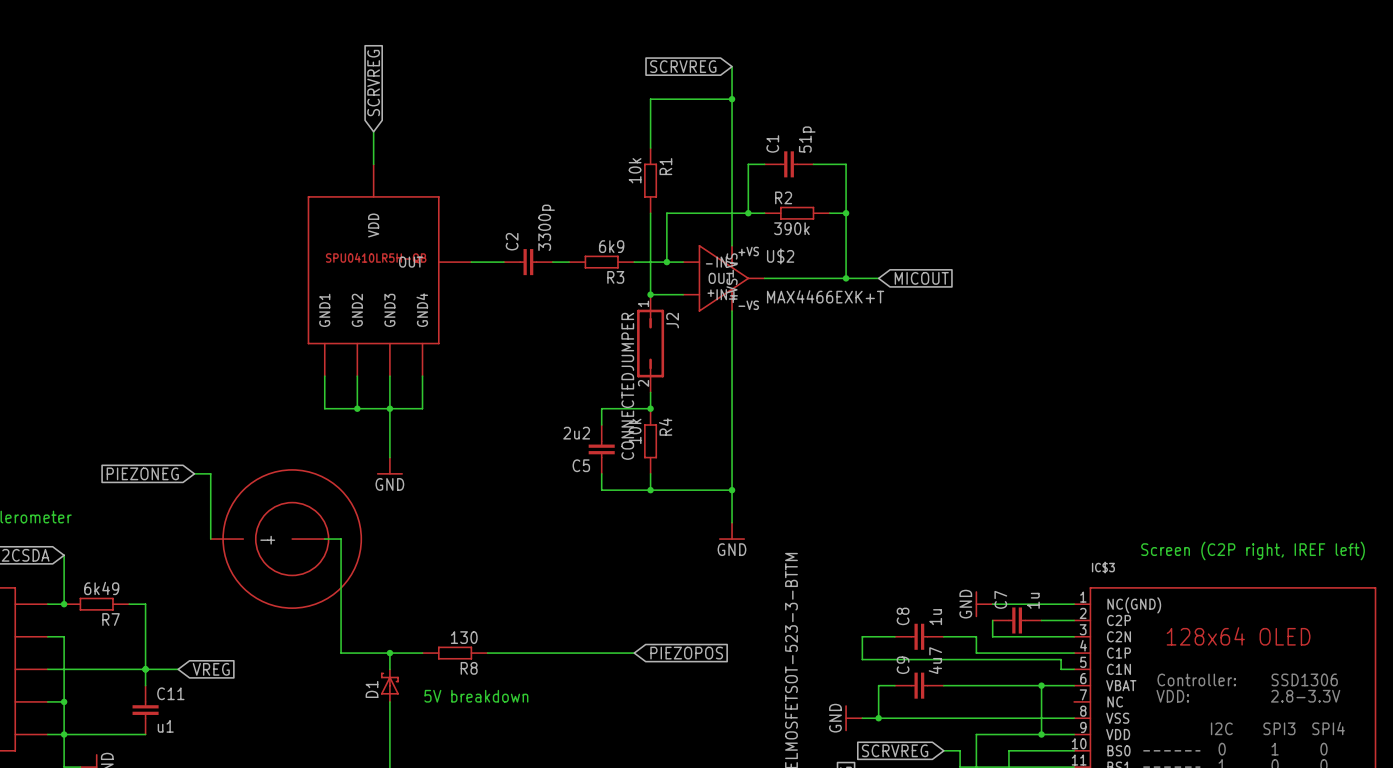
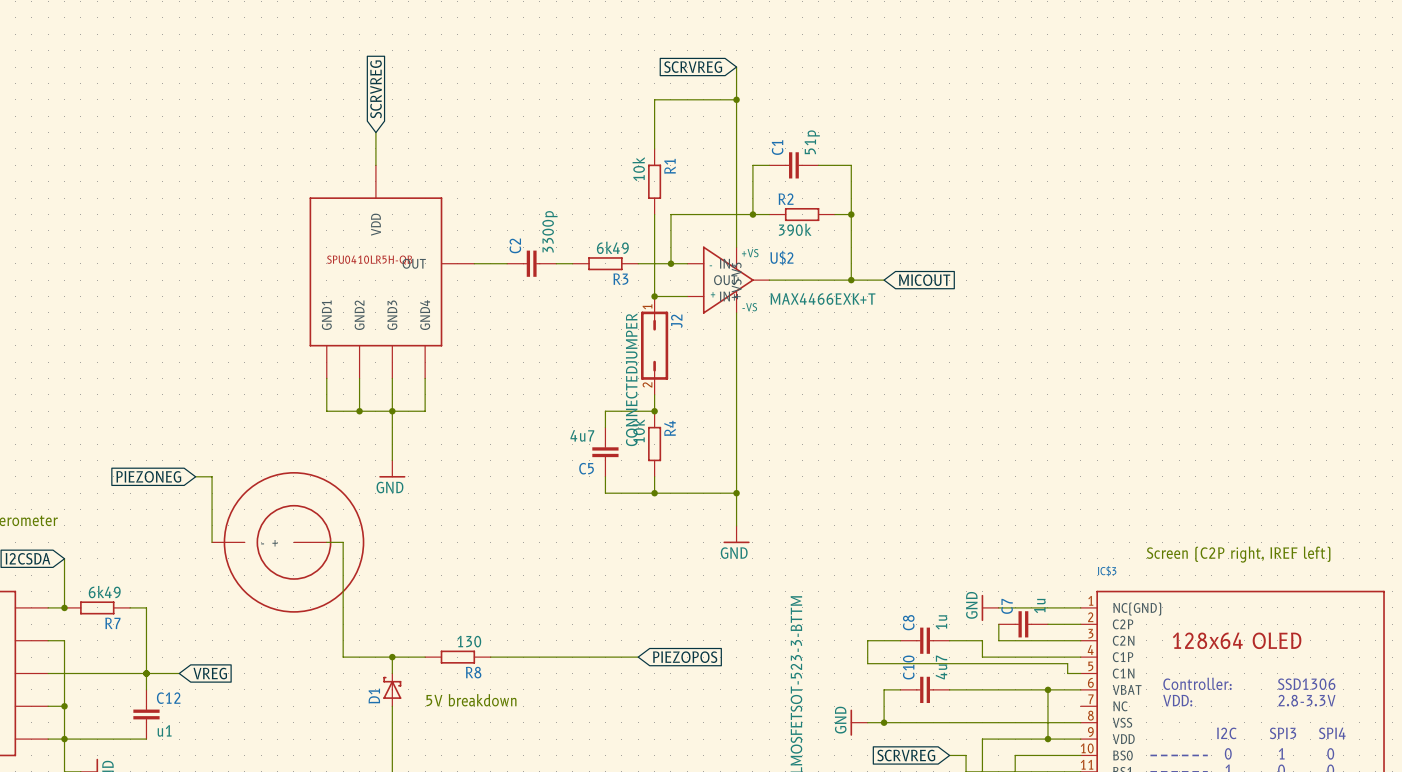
R3 value: 6k9 (611, 246) -> 6k49 (612, 247)
C5 value: 2u2 (576, 433) -> 4u7 (582, 435)
C9 name: C9 (903, 665) -> C10 (908, 667)
C11 name: C11 (170, 693) -> C12 (168, 698)

